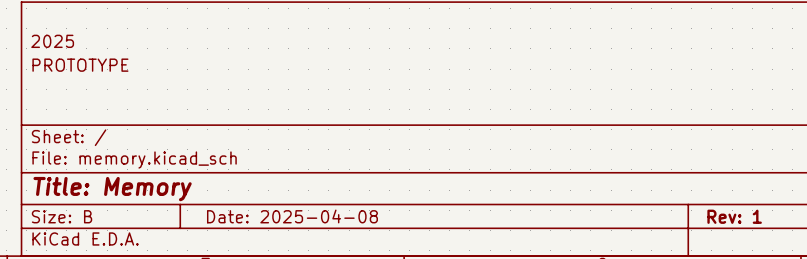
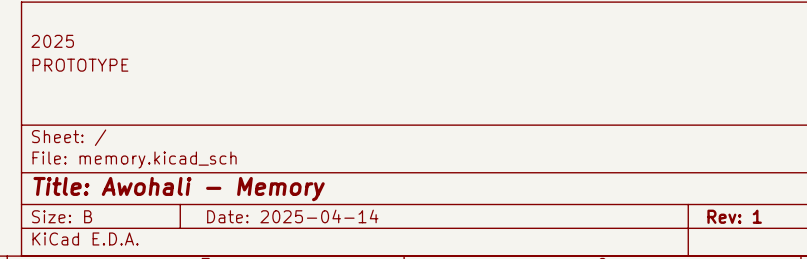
title block: Title: Memory (112, 189) -> Title: Awohali - Memory (179, 189)
title block: Date: 2025-04-08 (292, 216) -> Date: 2025-04-14 (292, 216)

